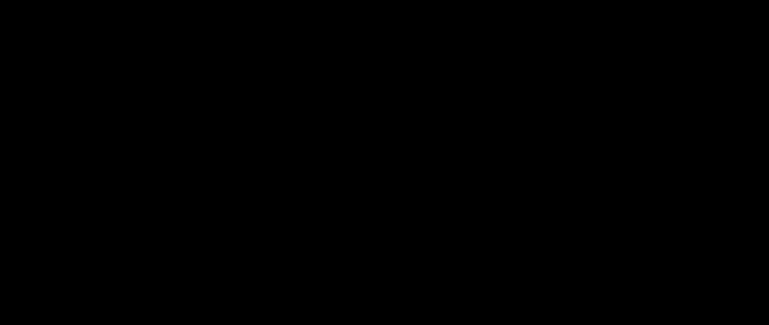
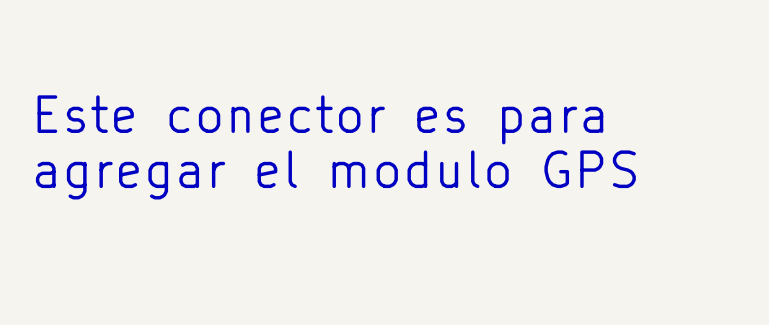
text: none -> Este conector es para (320, 119)
text: none -> agregar el modulo GPS (335, 174)

